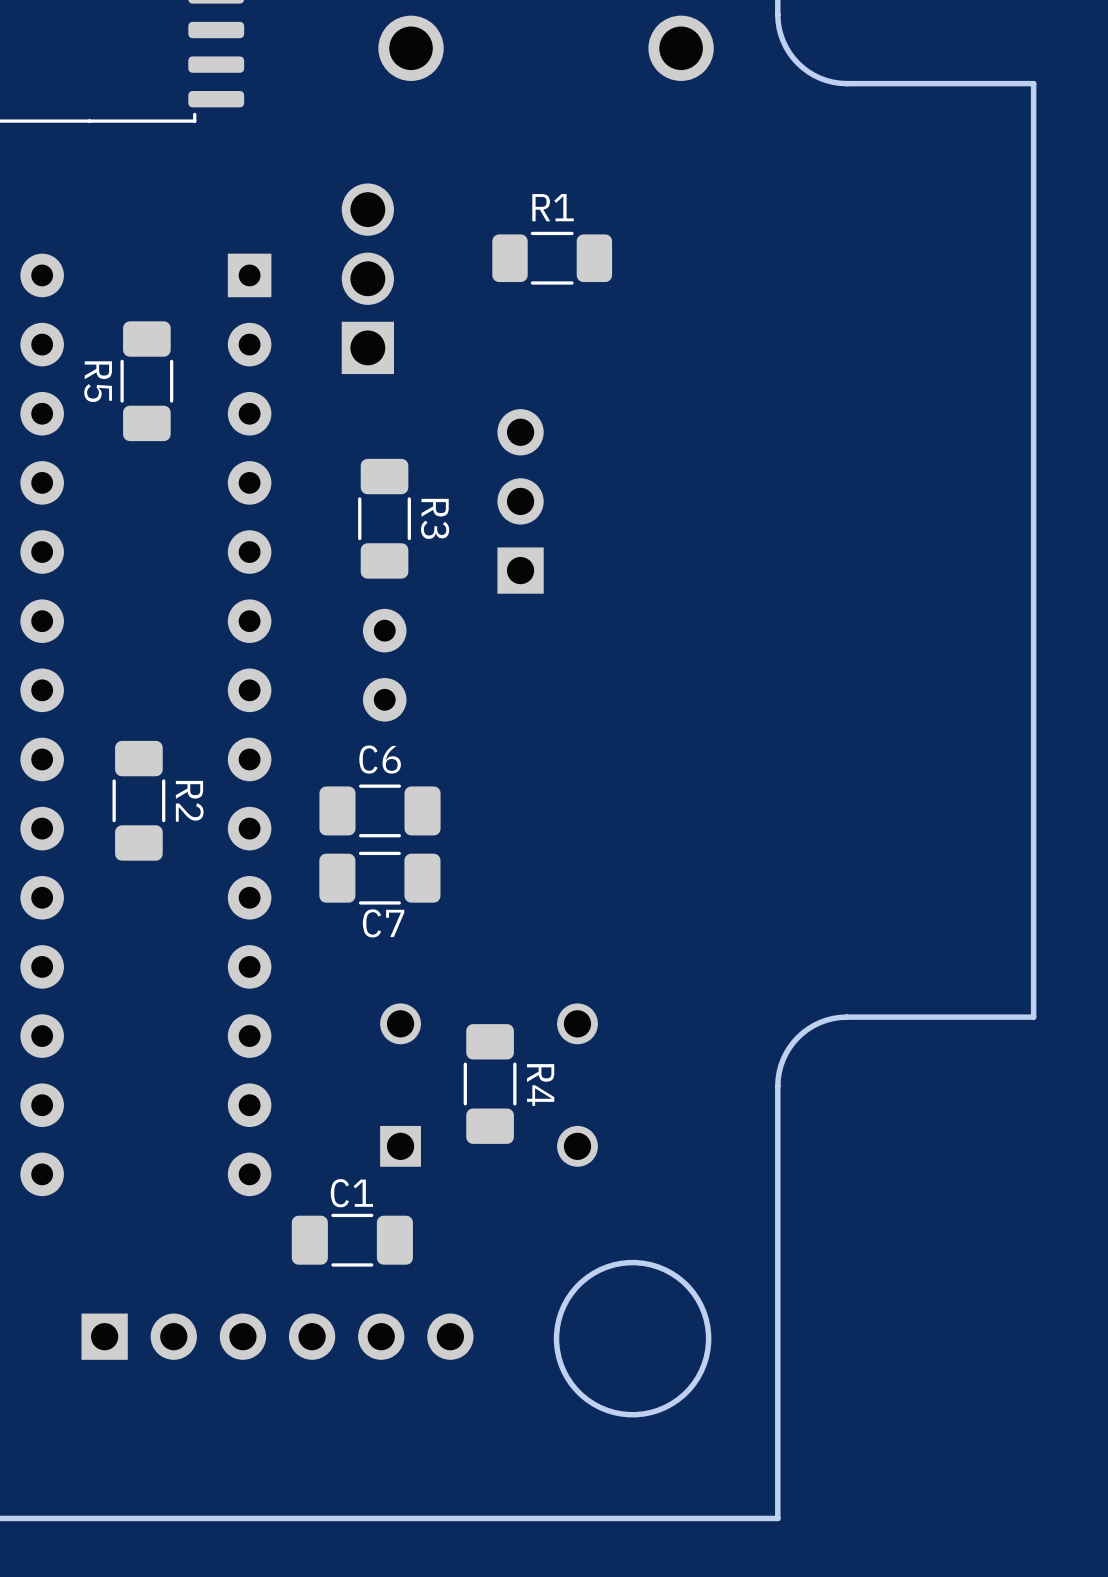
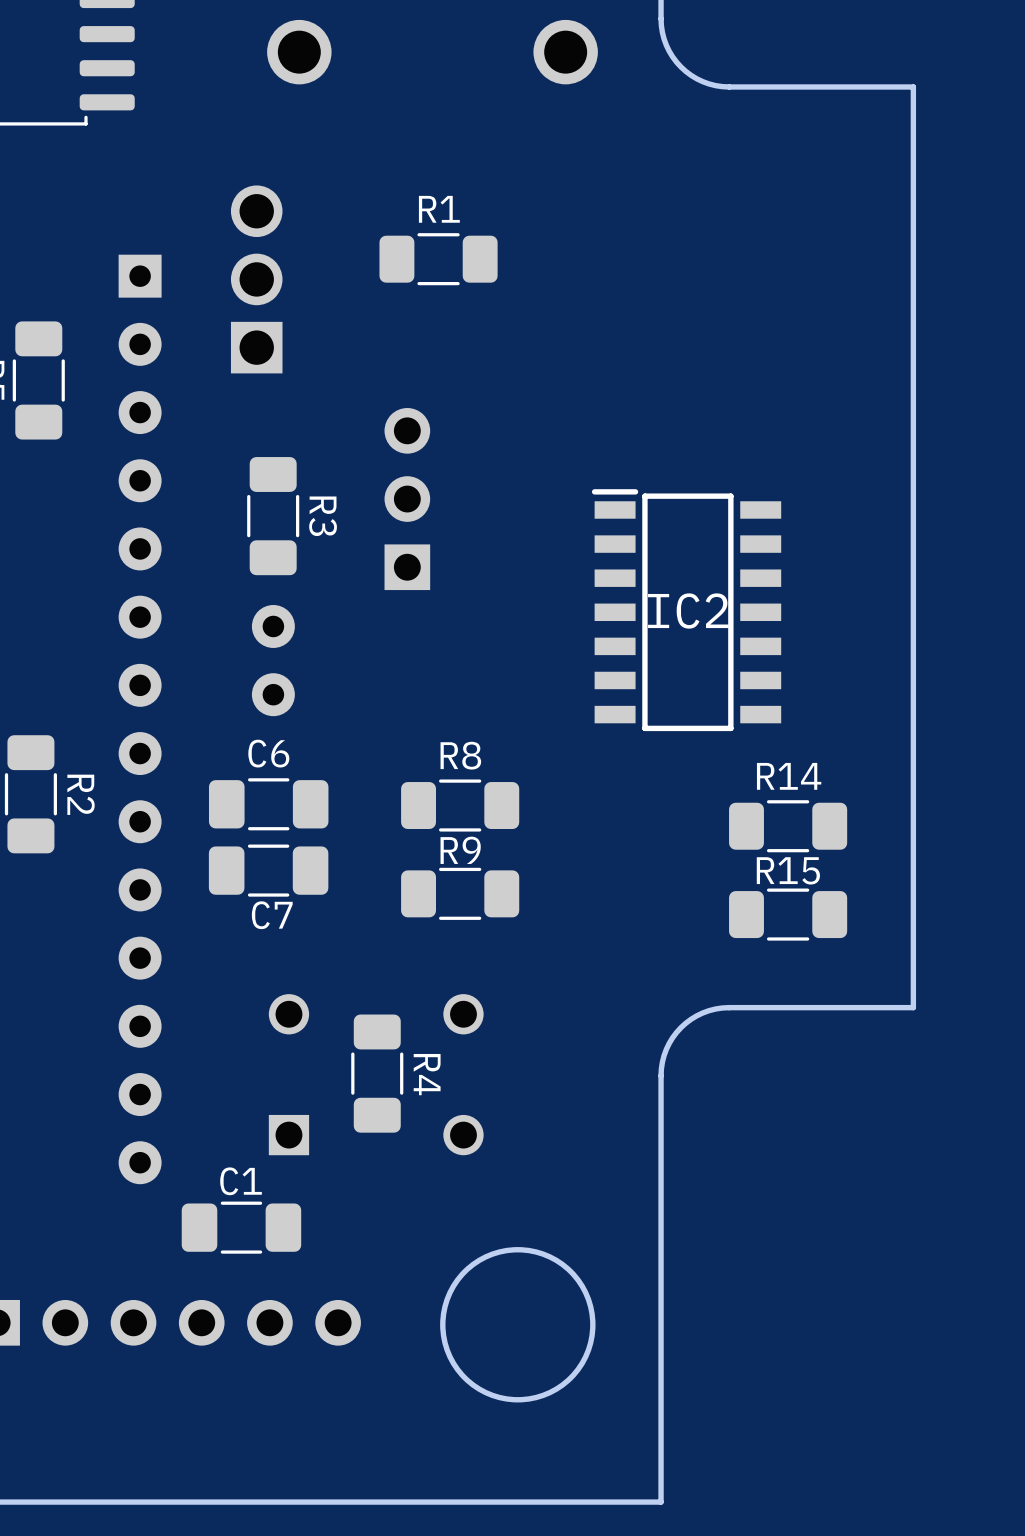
IC2: none -> (686, 610)
R8: none -> (460, 805)
R14: none -> (788, 826)
R9: none -> (460, 893)
R15: none -> (788, 914)

